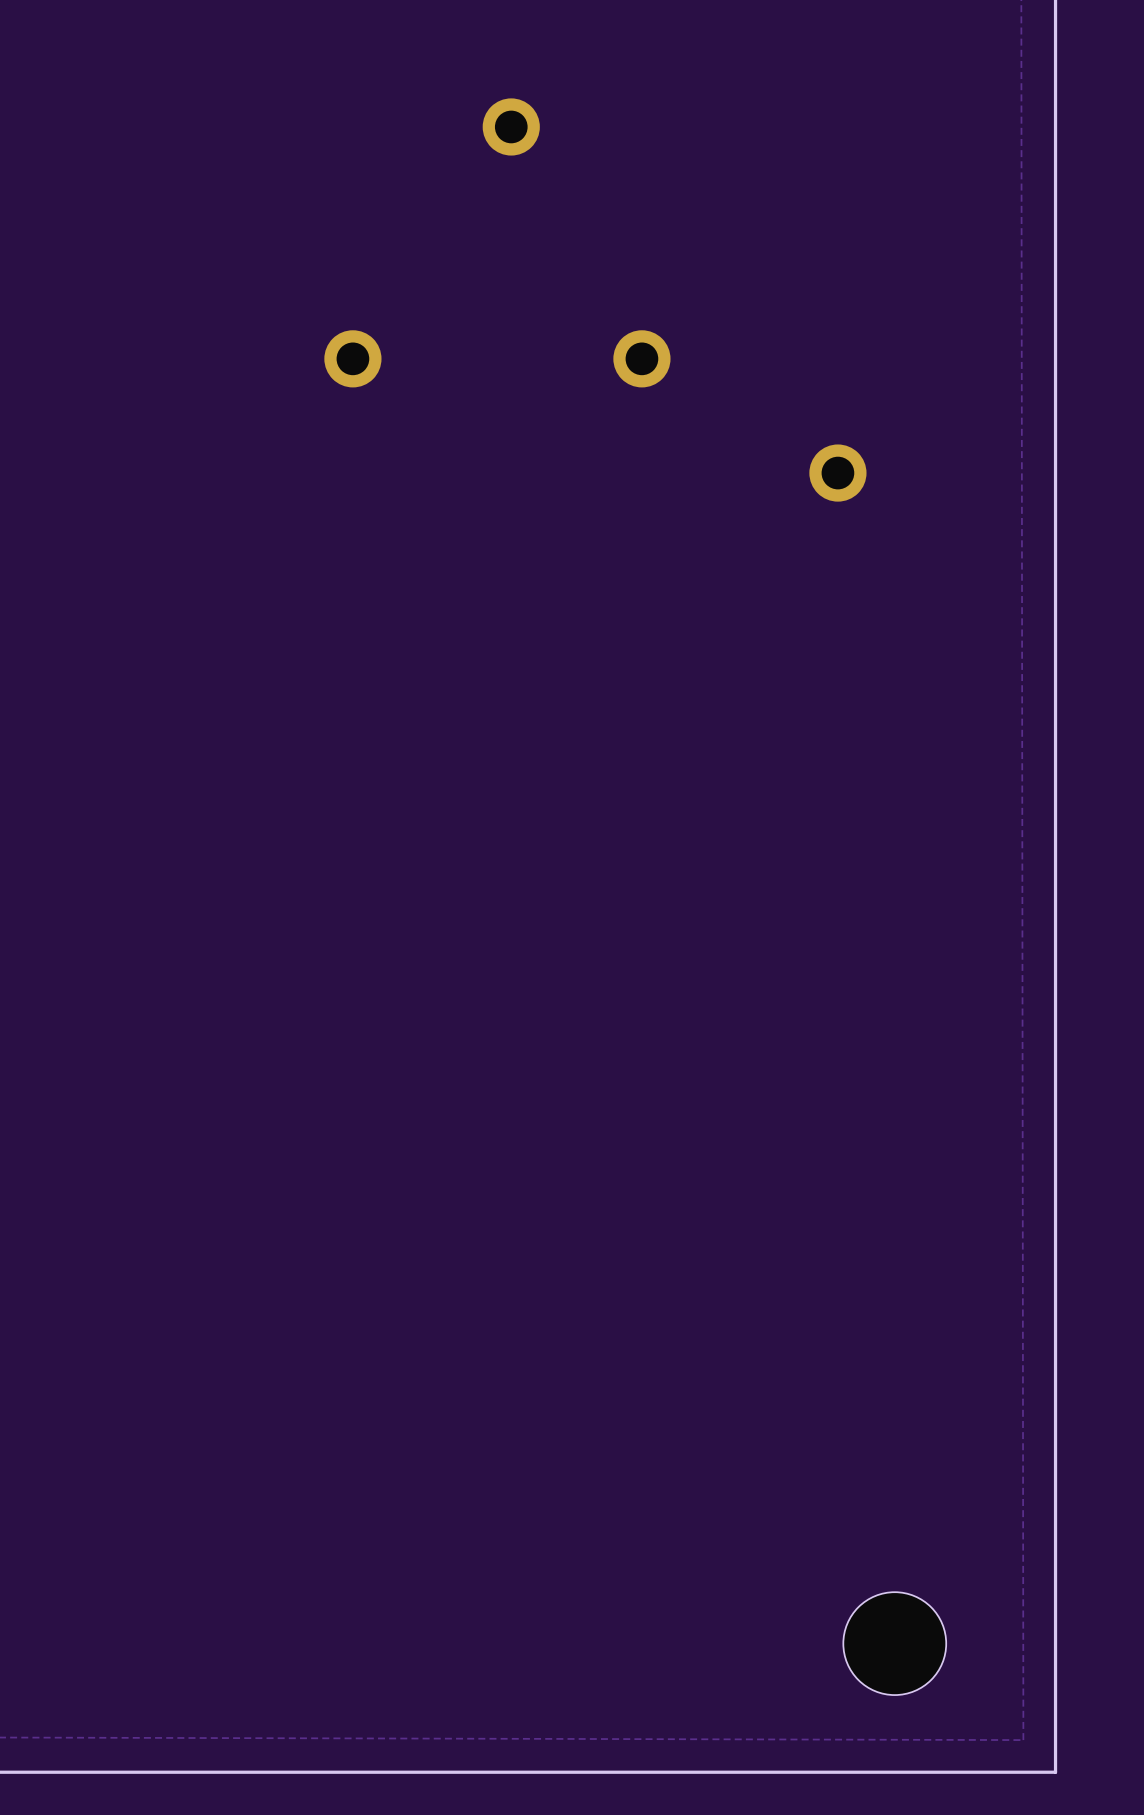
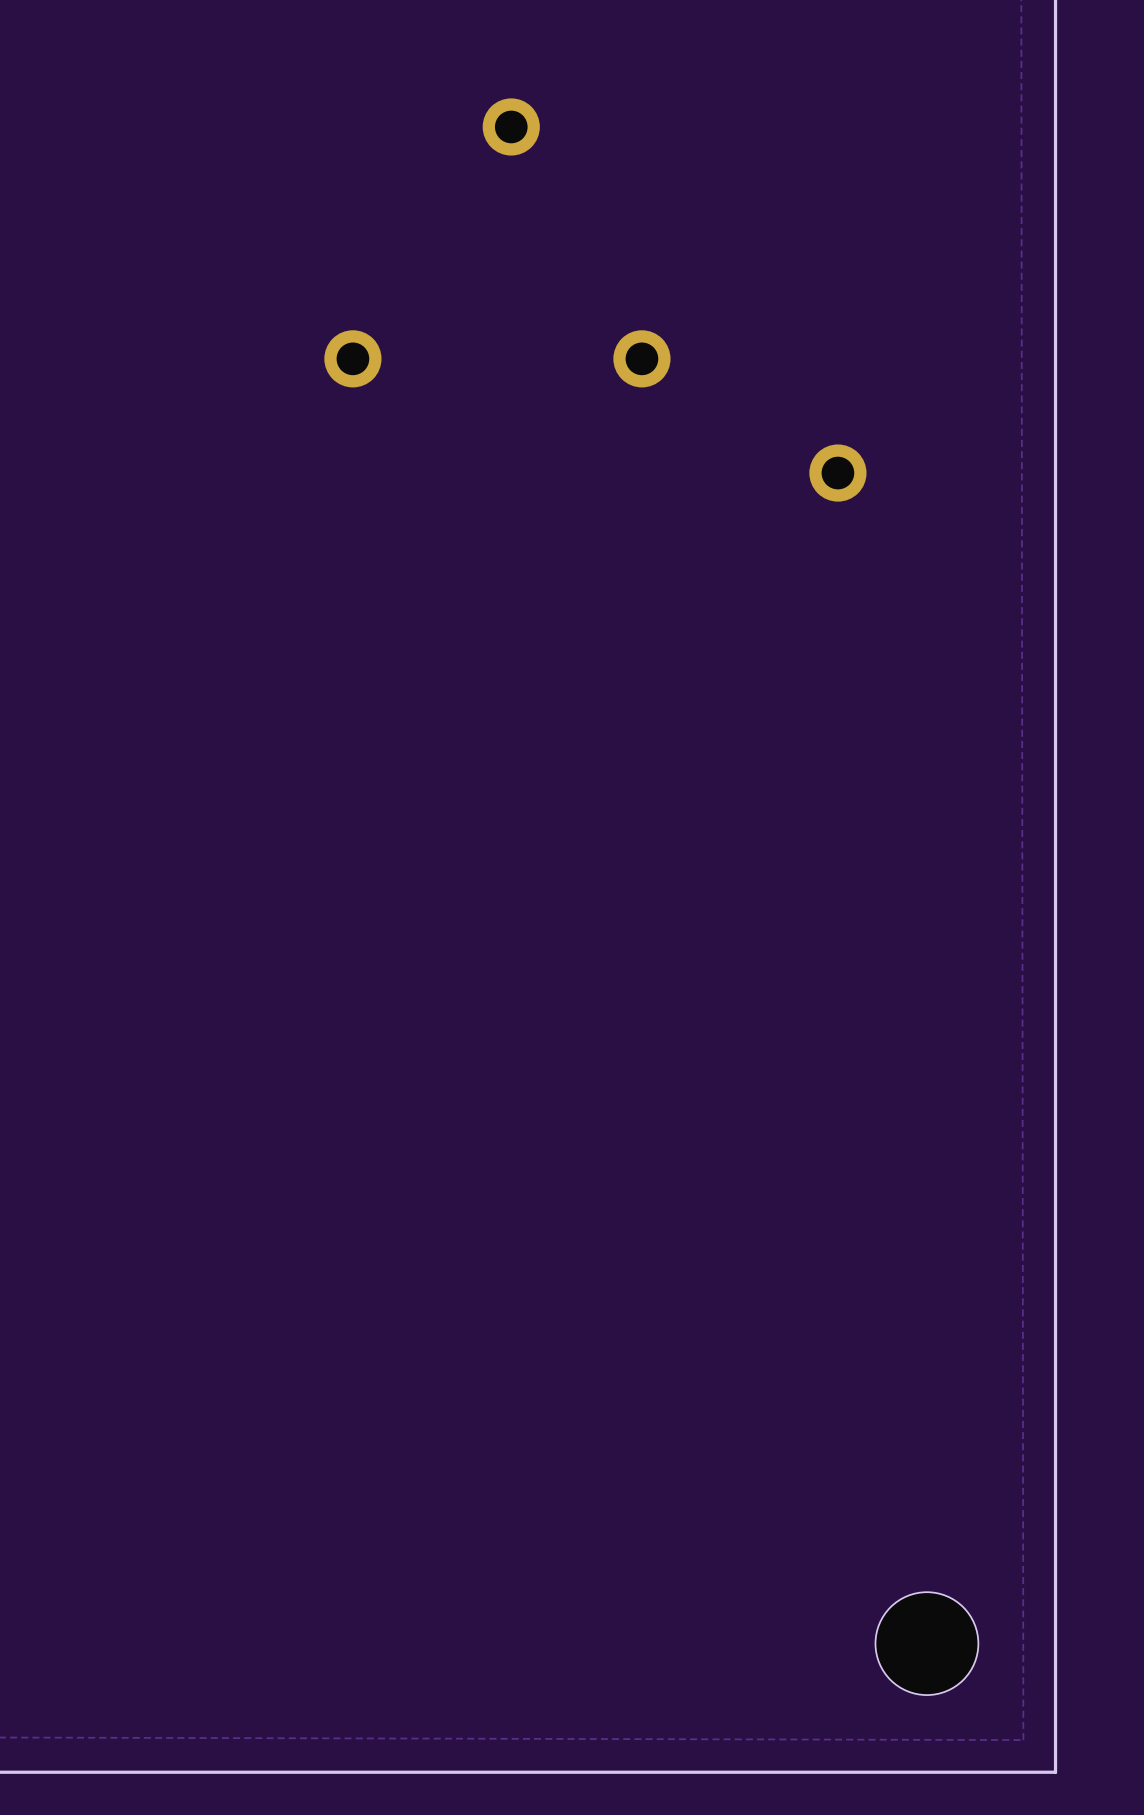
part position: (894, 1643) -> (926, 1643)

